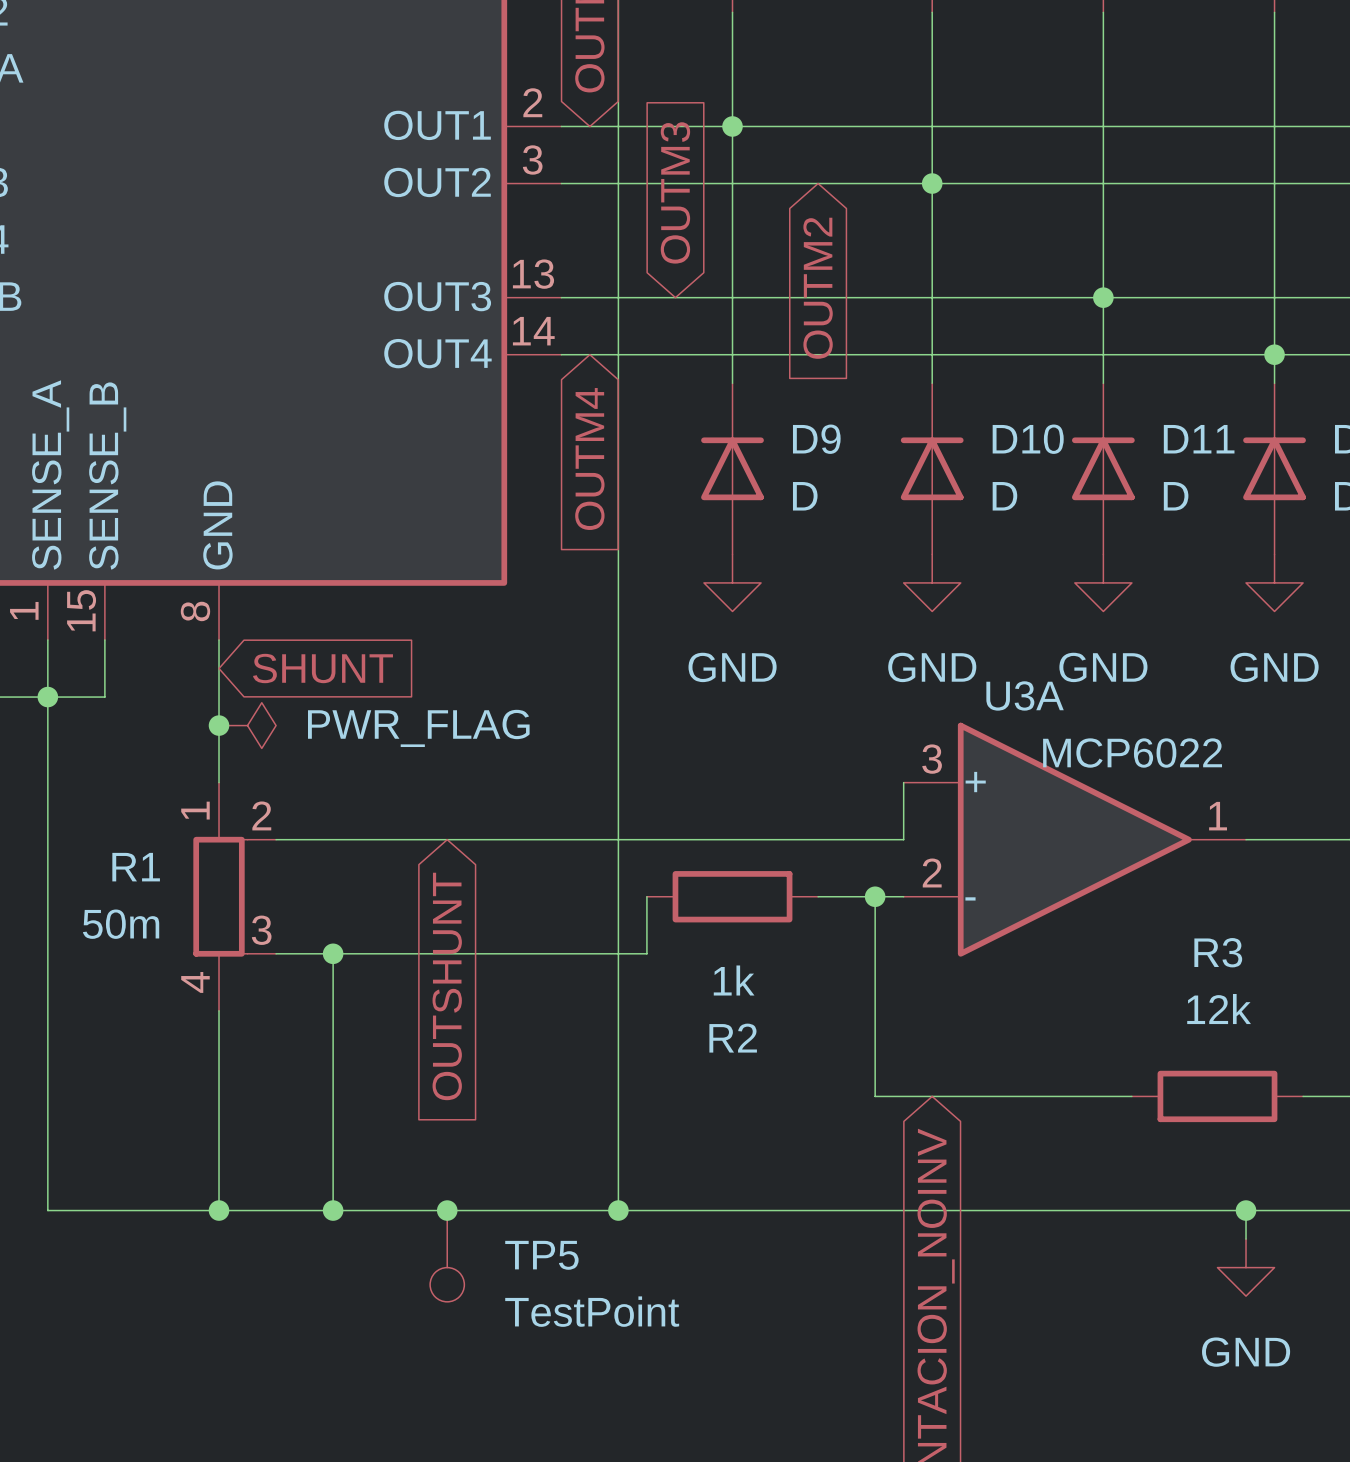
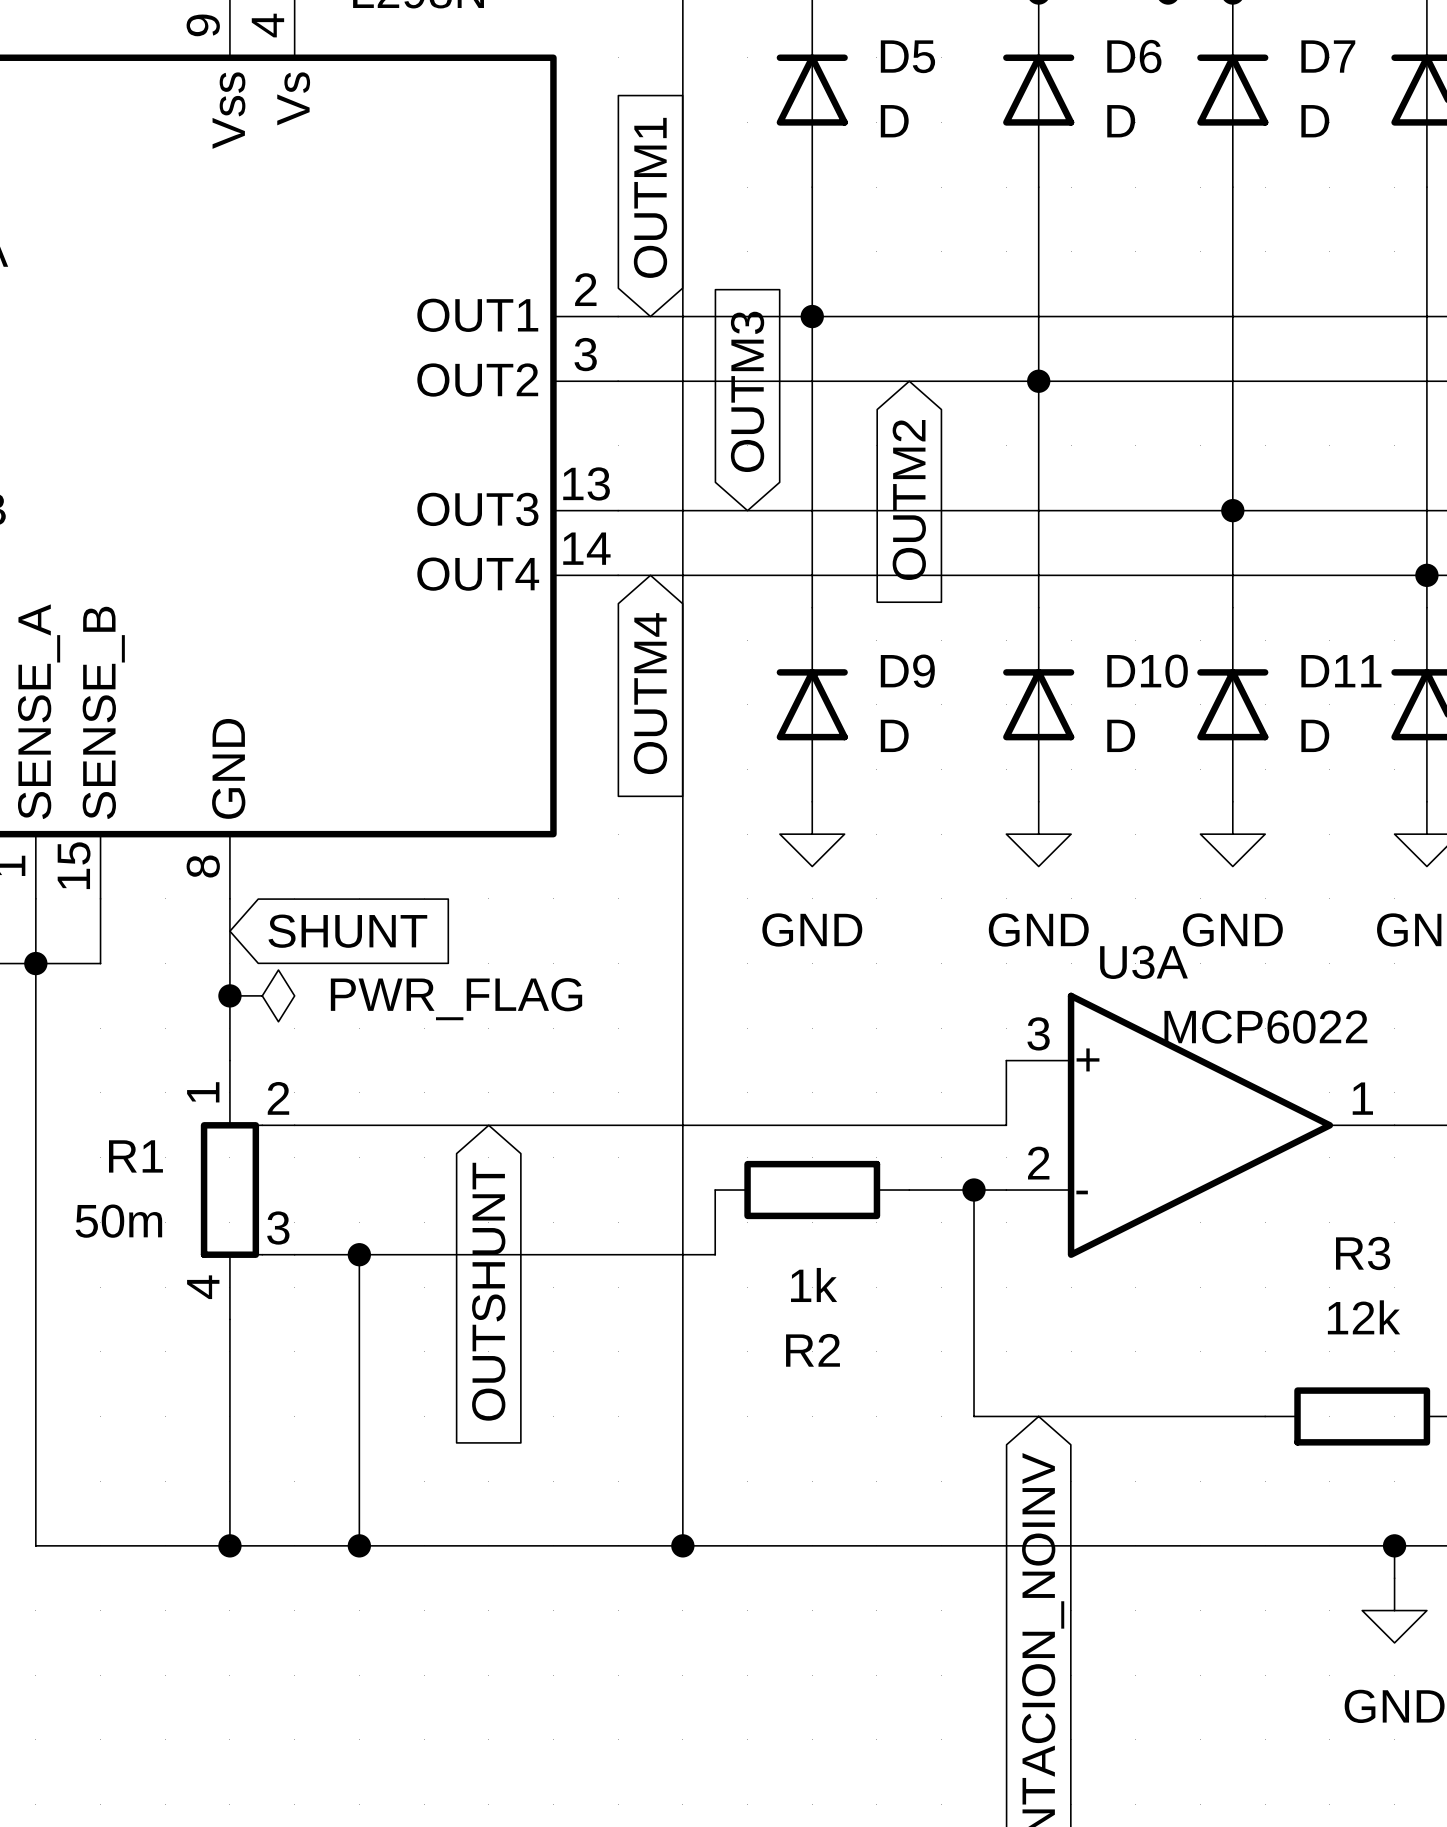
junction: (447, 1210) -> none
TP5: TestPoint (447, 1256) -> none

